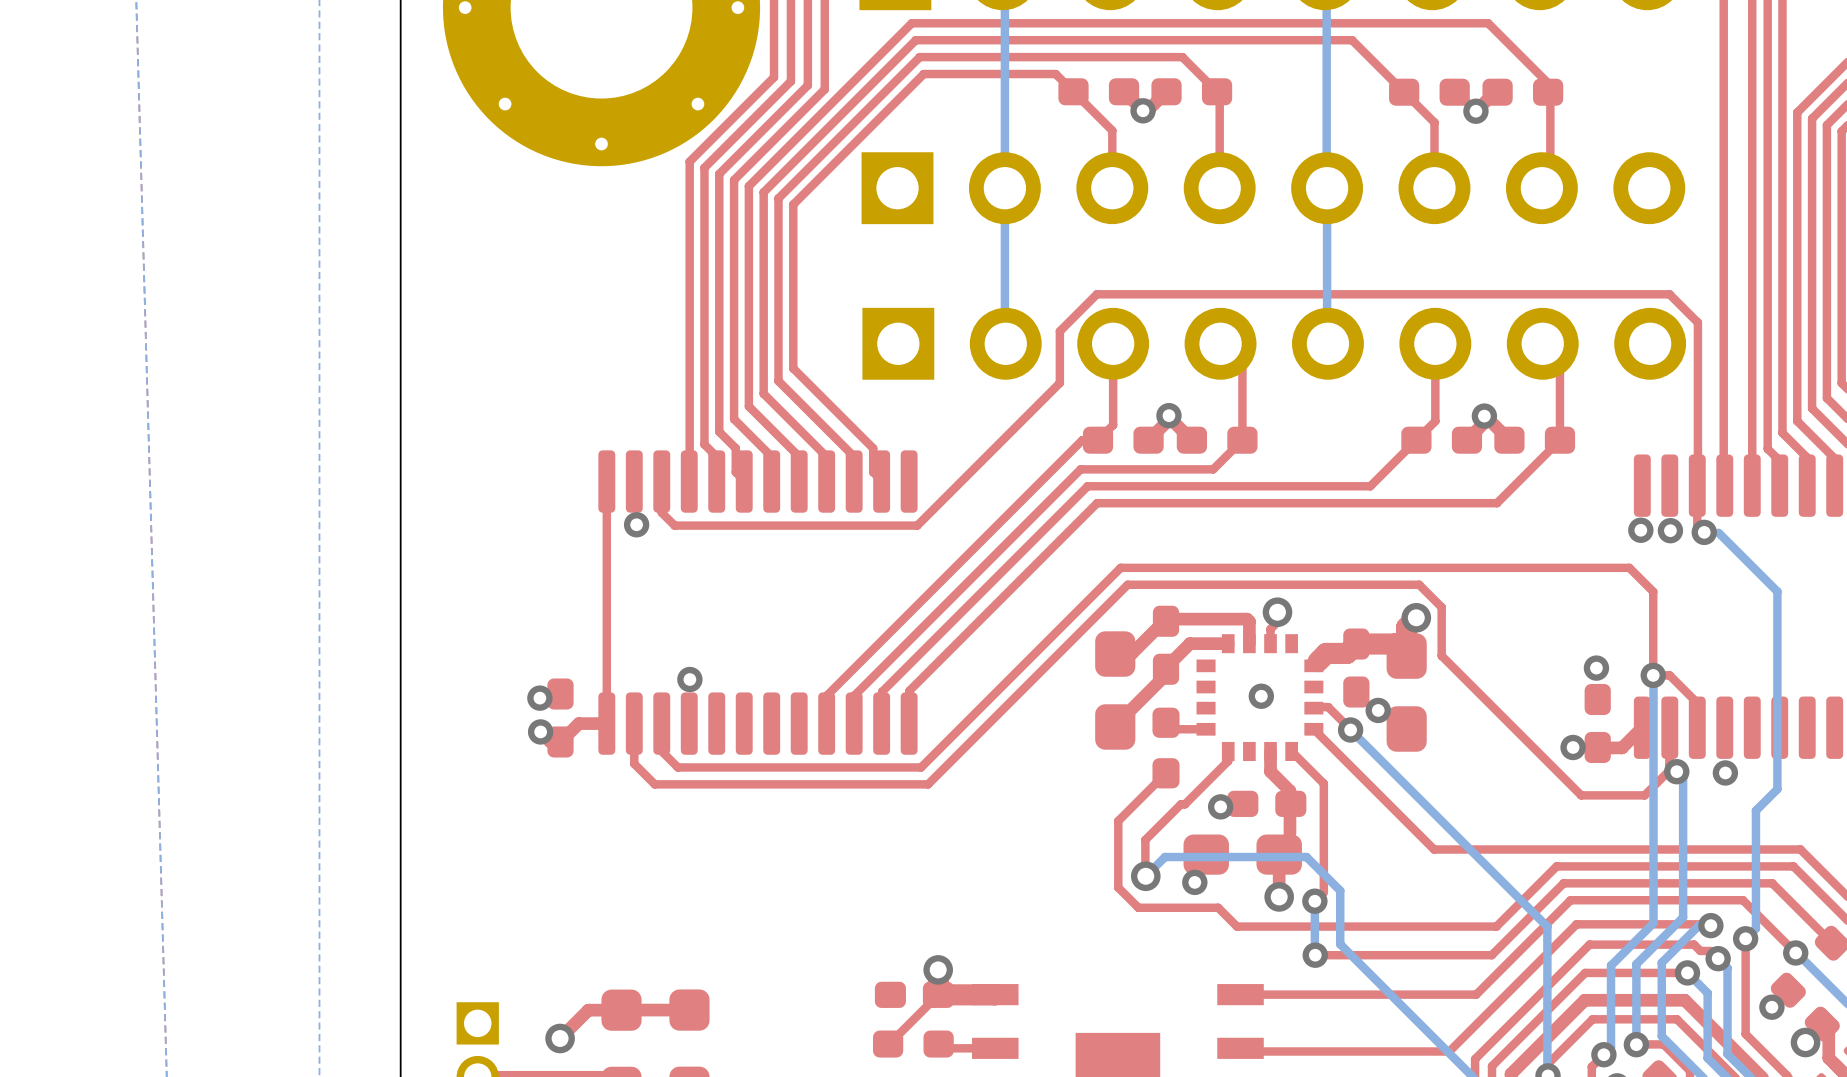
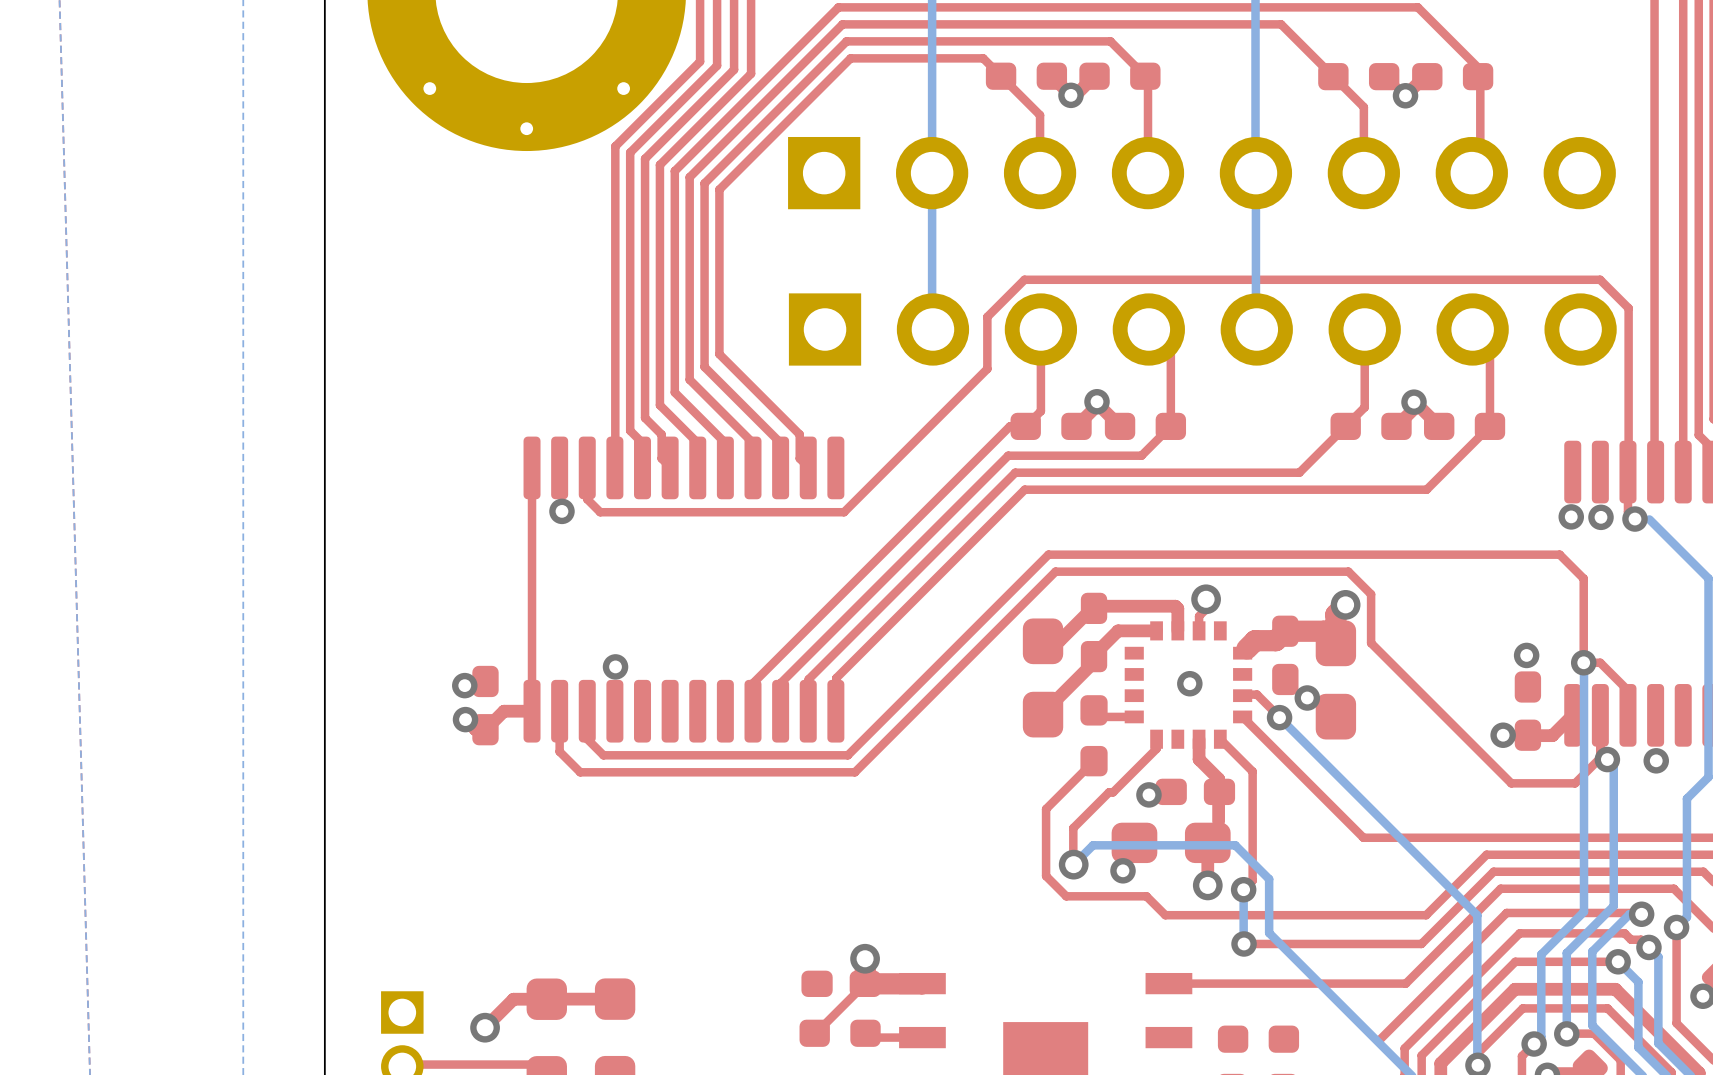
part: none -> (1258, 1039)
top track: (1449, 1051) (1243, 1051) -> none

